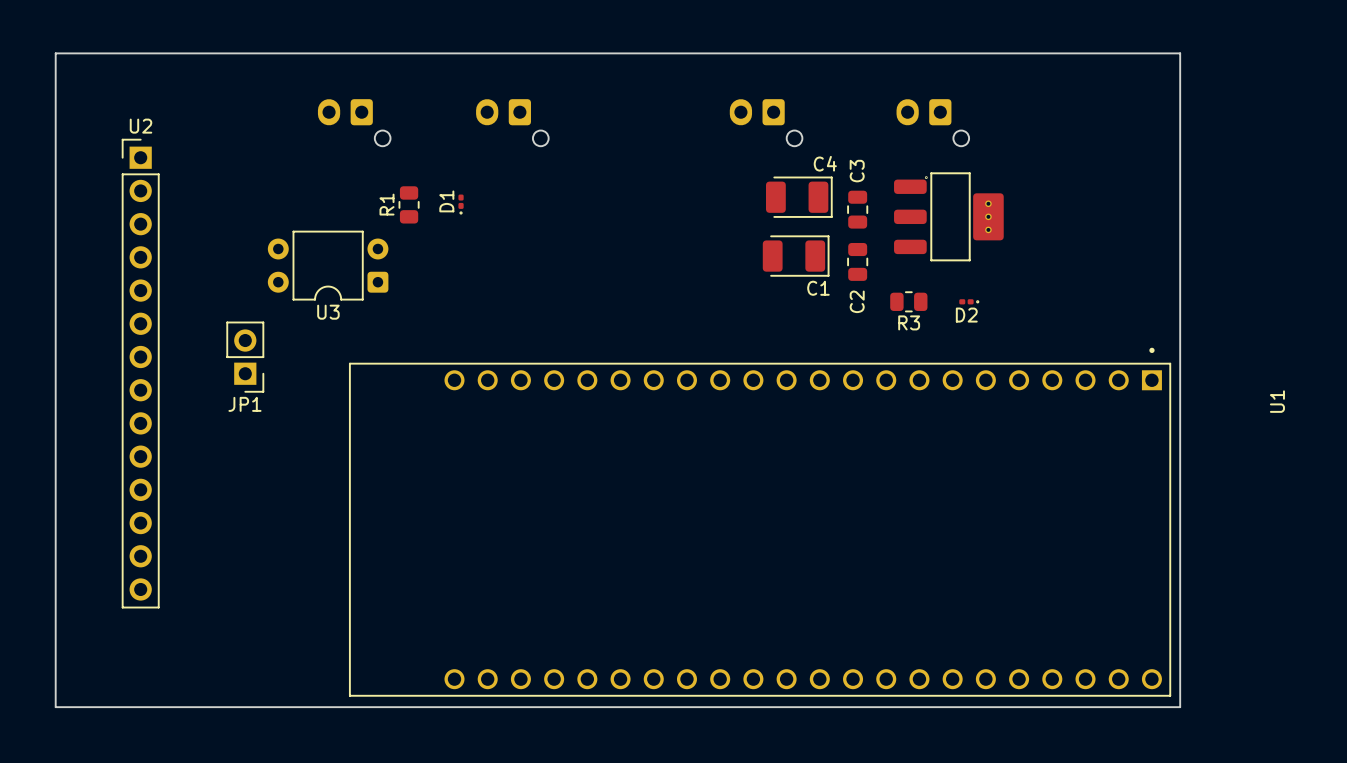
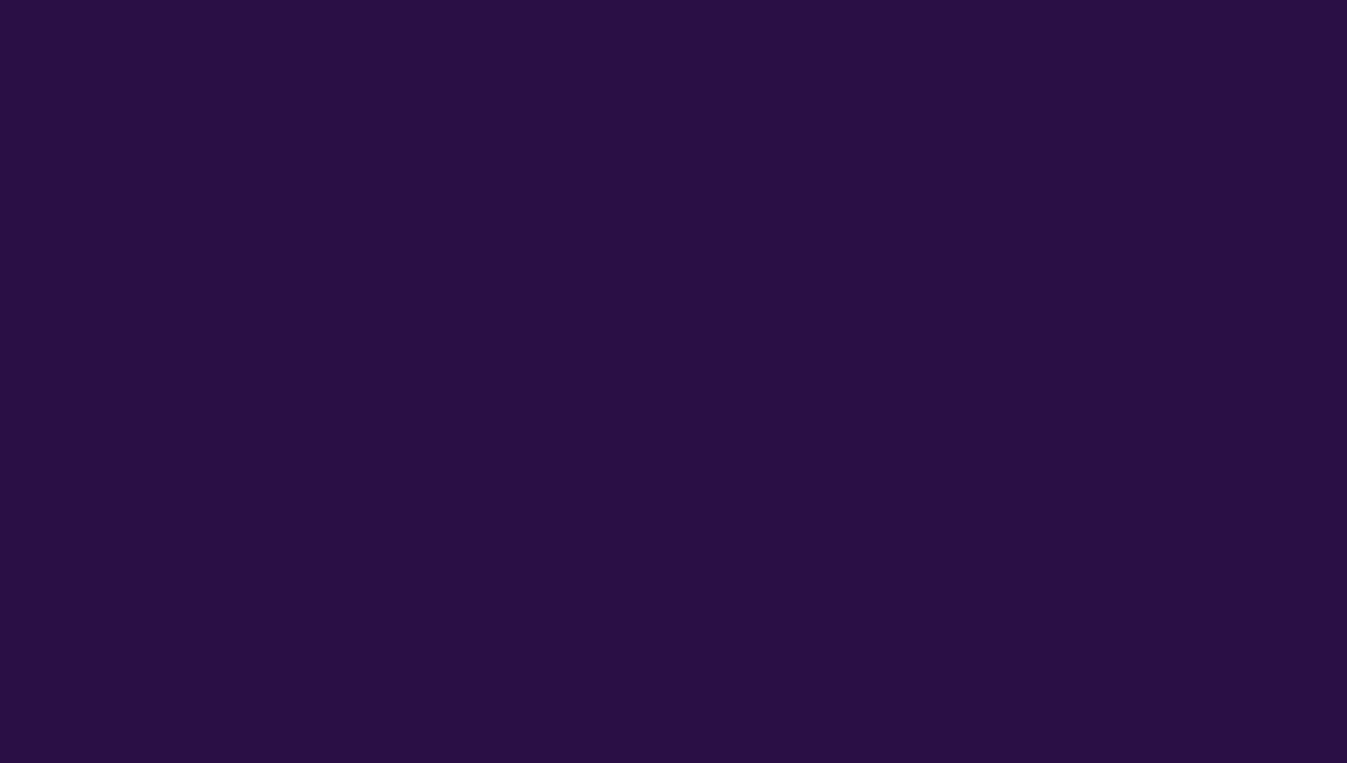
board edge: (55, 53) (1180, 53) (1180, 707) (55, 707) (55, 53) -> none
part: (354, 122) -> none
part: (512, 122) -> none
part: (766, 122) -> none
part: (932, 122) -> none
C4: (799, 197) -> none
R1: (409, 204) -> none
D1: (461, 204) -> none
C3: (857, 209) -> none
part: (948, 216) -> none
C1: (796, 256) -> none
C2: (857, 261) -> none
U3: (328, 265) -> none
R3: (908, 301) -> none
D2: (969, 301) -> none
JP1: (245, 357) -> none
U2: (140, 373) -> none
U1: (760, 522) -> none

